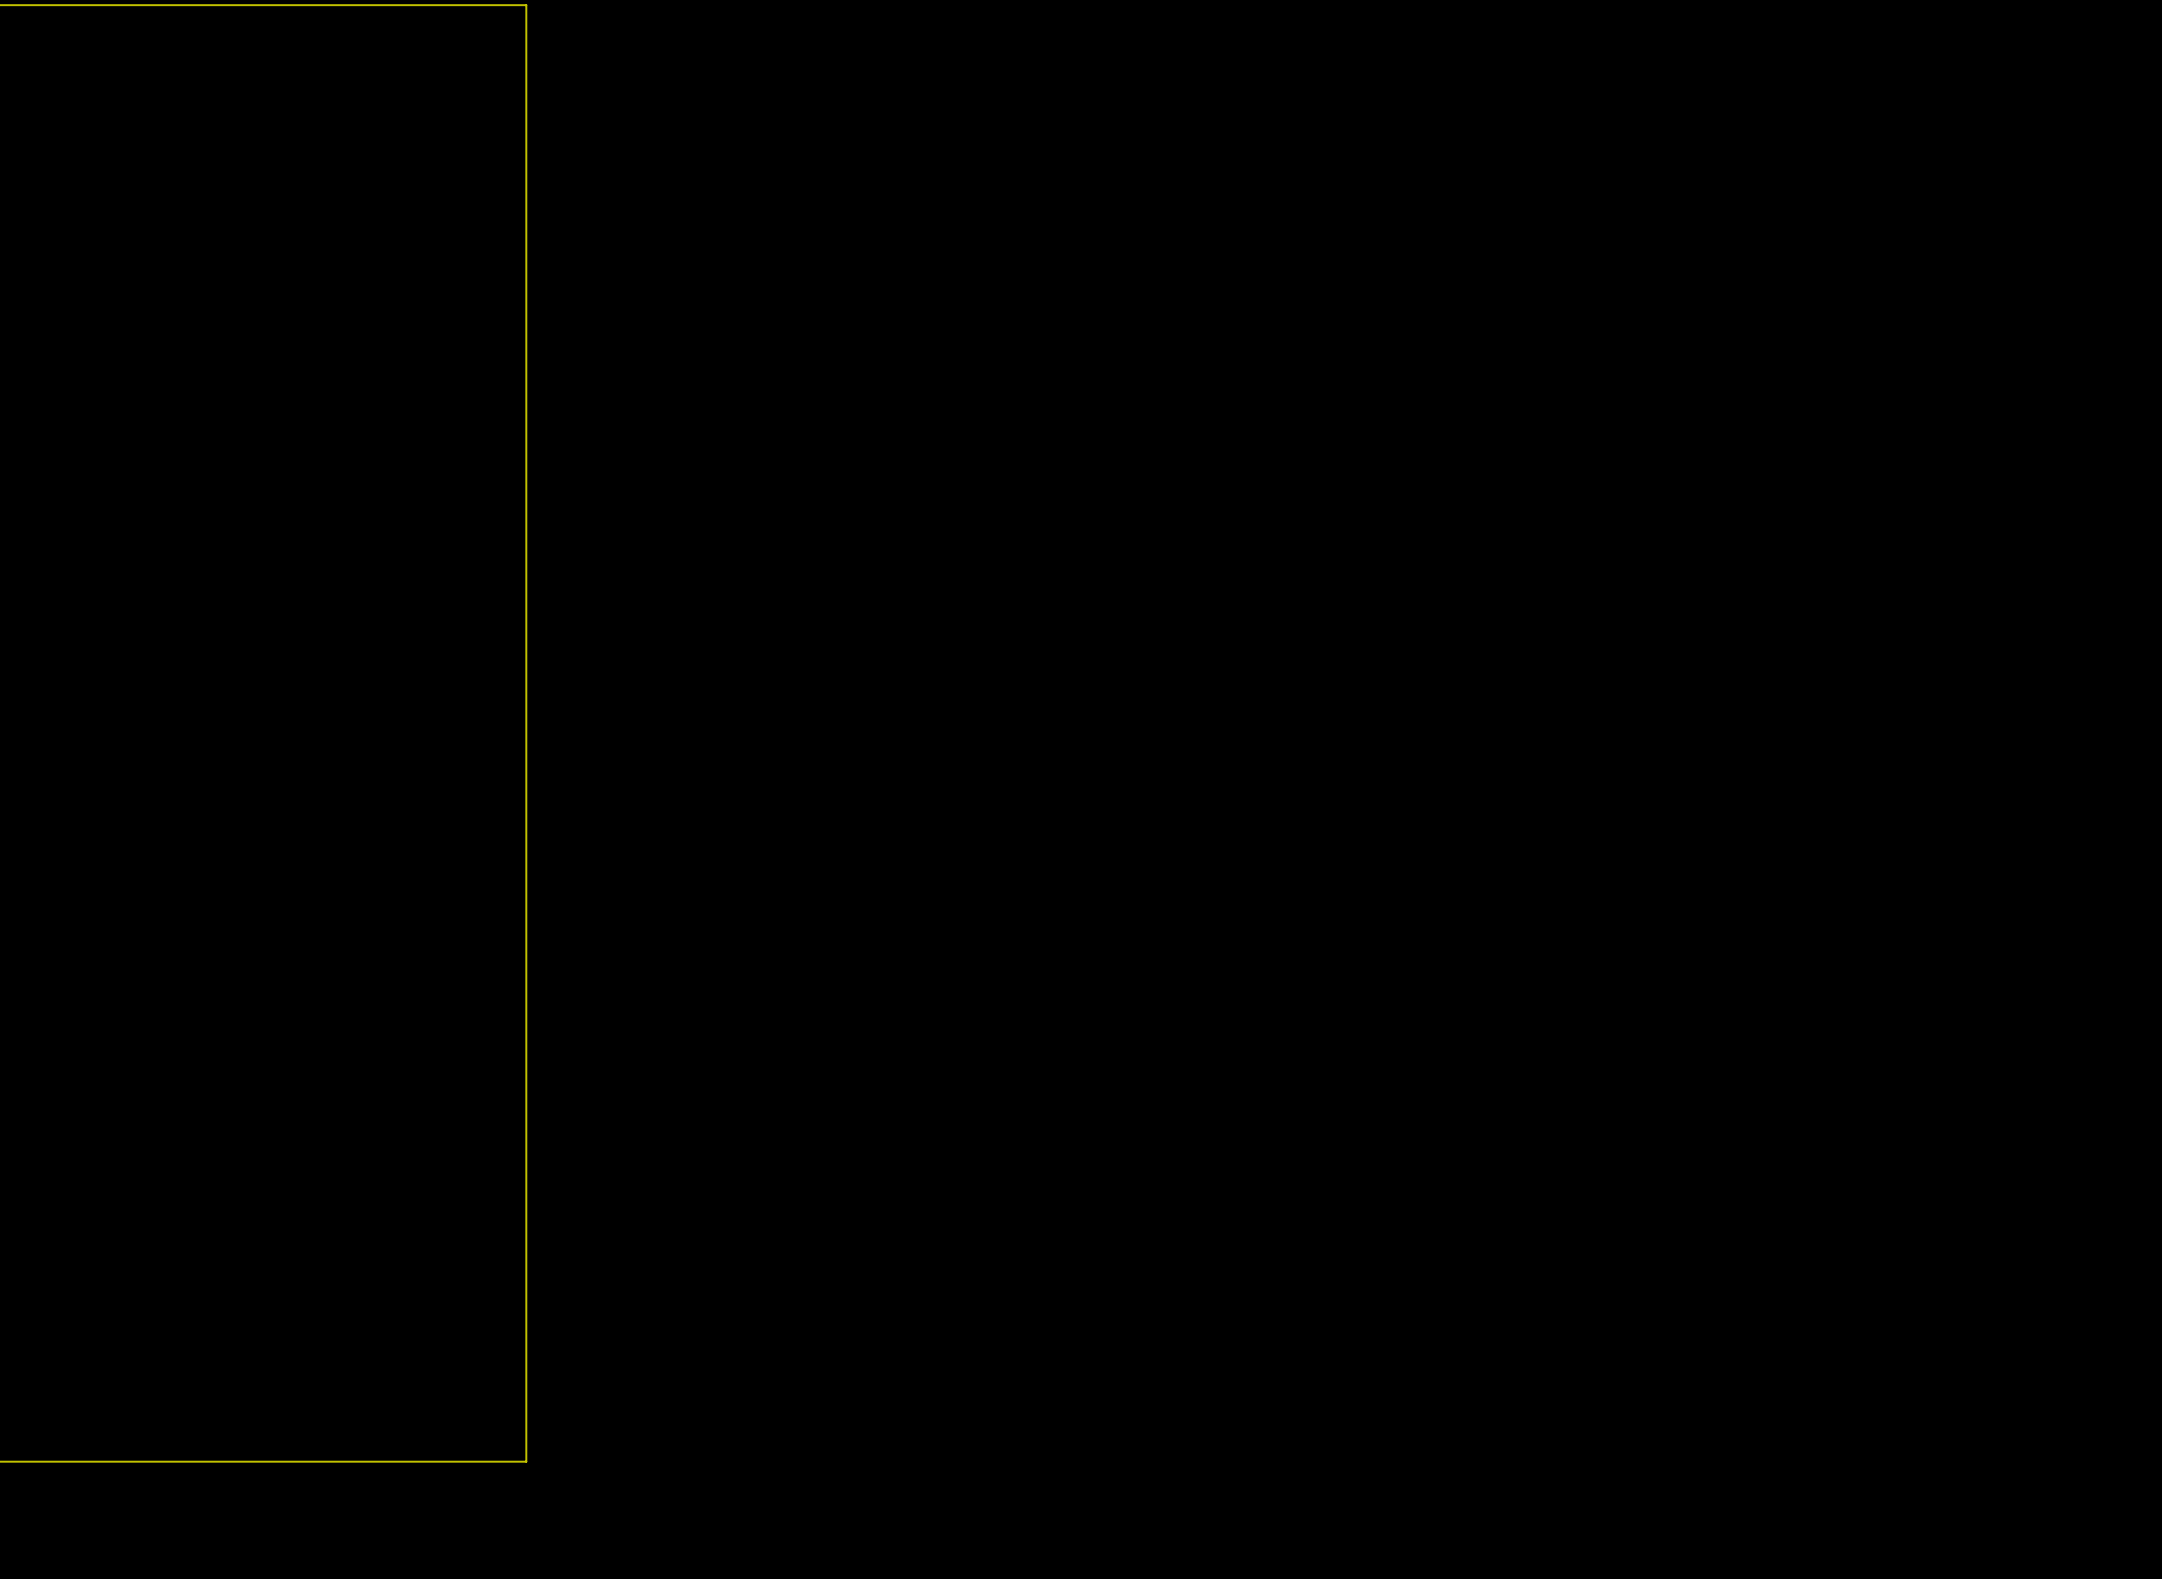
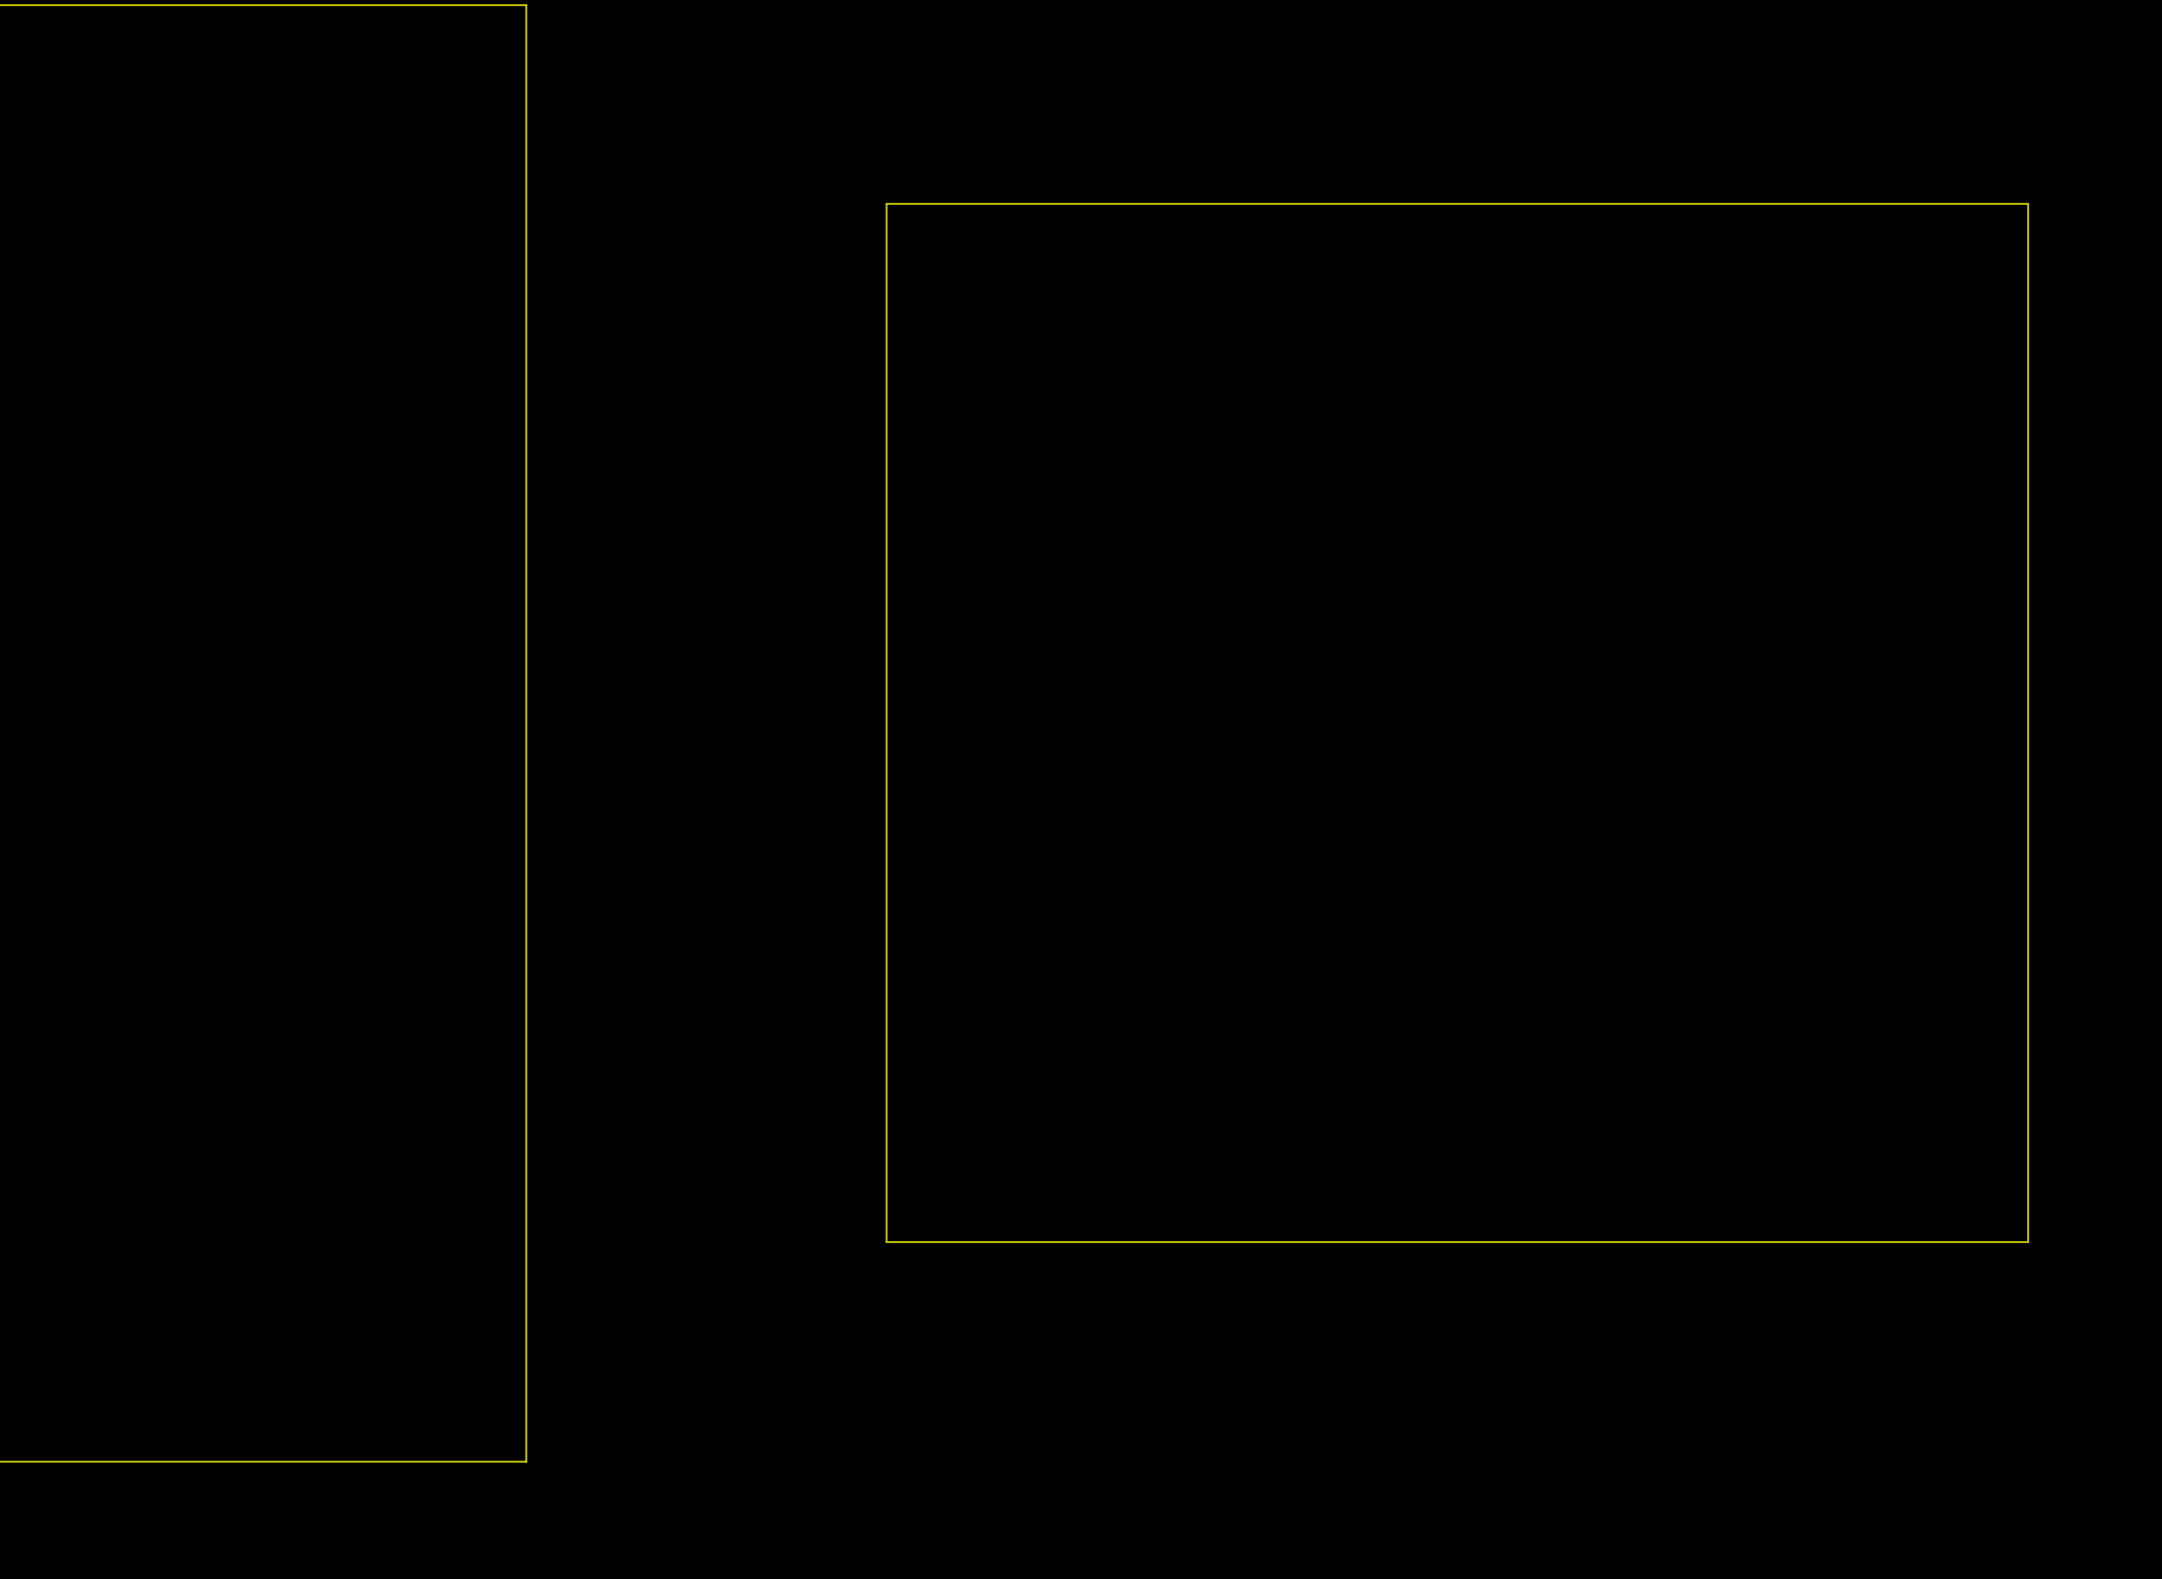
board edge: none -> (2028, 203) (886, 203) (886, 1242) (2028, 1242) (2028, 203)

